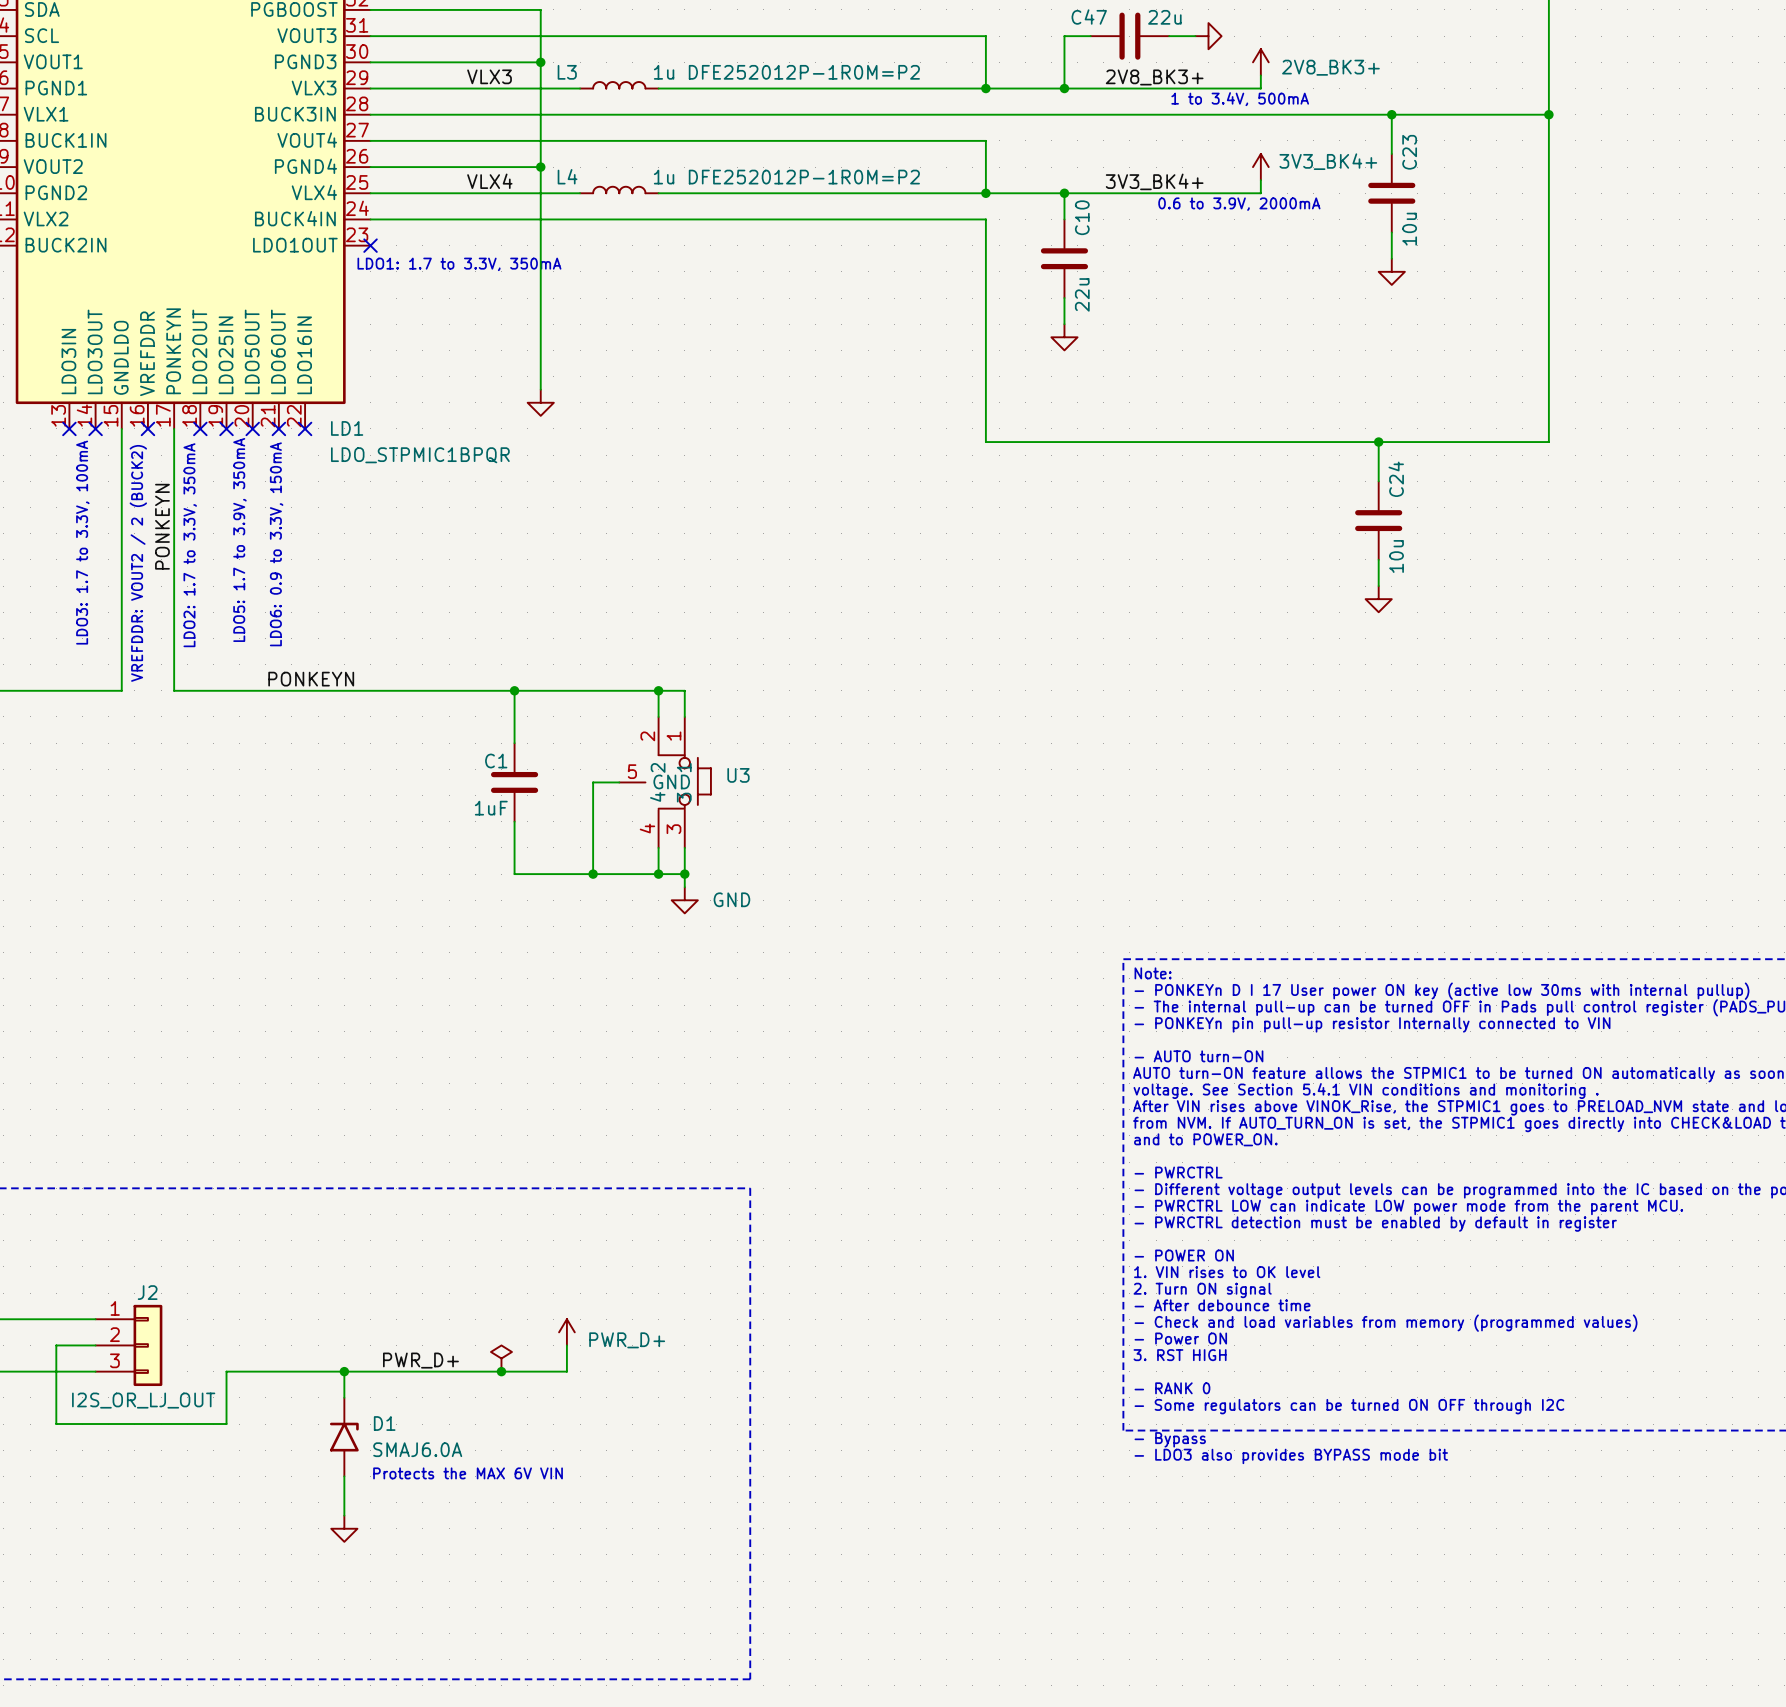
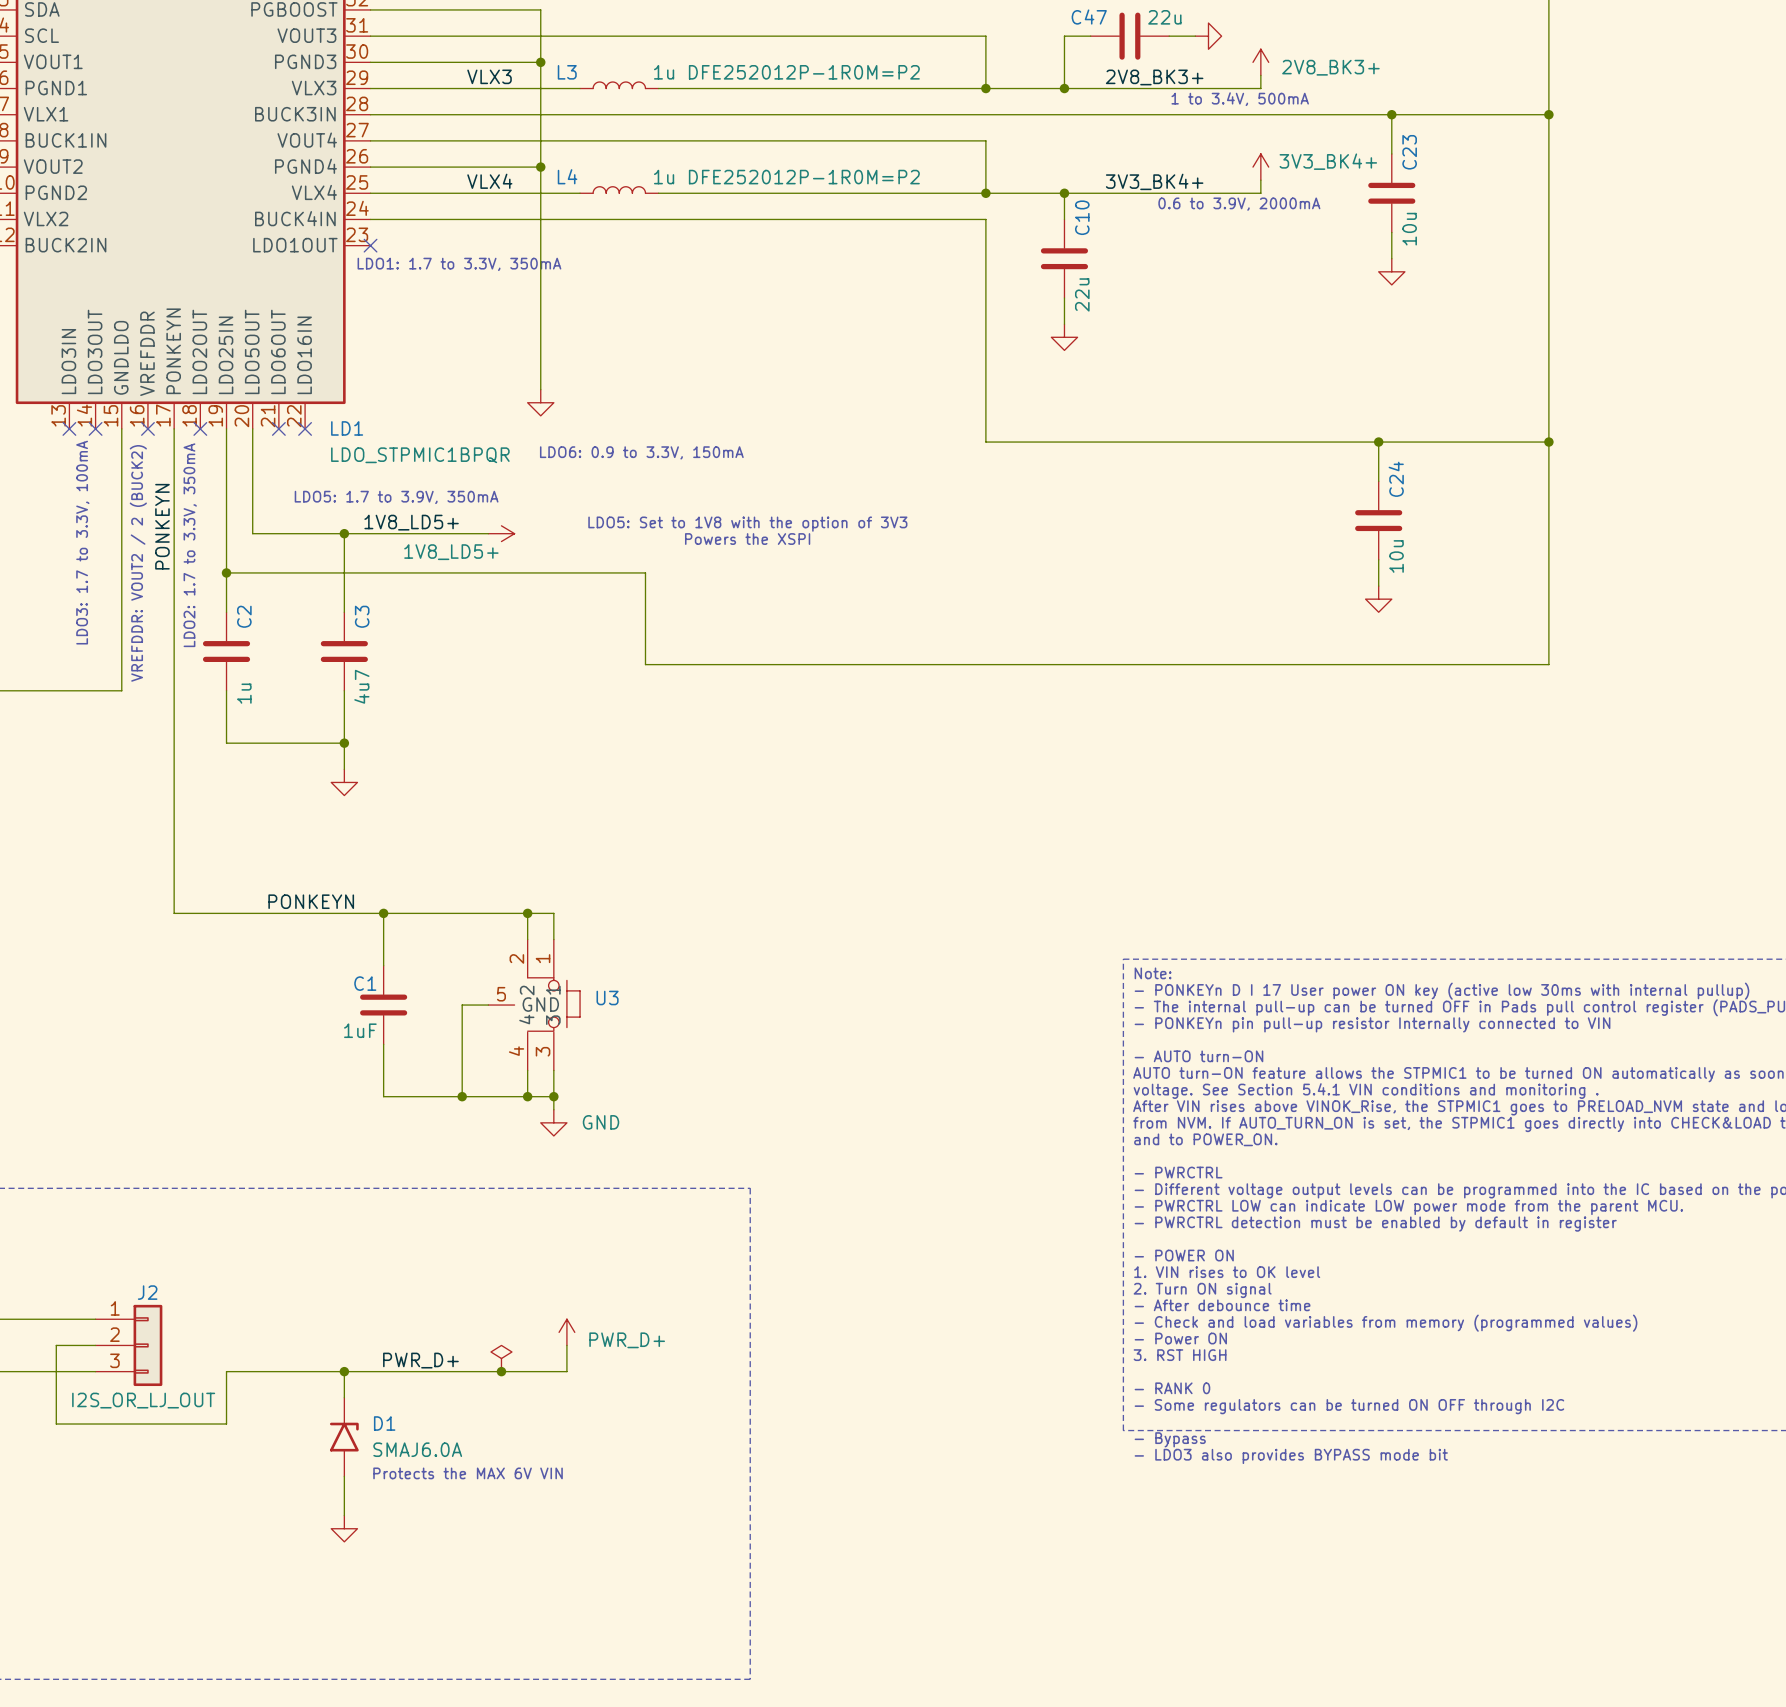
wire: none -> (226, 428) (226, 612)
no-connect mark: (226, 428) -> none
wire: none -> (252, 428) (252, 533) (488, 533)
no-connect mark: (252, 428) -> none
wire: none -> (1548, 442) (1548, 664) (645, 664) (645, 572) (226, 572)
junction: none -> (1548, 442)
text: none -> LDO6: 0.9 to 3.3V, 150mA (641, 452)
label: none -> 1V8_LD5+ (411, 522)
text: none -> LDO5: Set to 1V8 with the option of 3V3 (747, 524)
wire: none -> (344, 533) (344, 612)
junction: none -> (344, 533)
power symbol: none -> 1V8_LD5+ (501, 533)
text rotation: 0° (239, 539) -> 90° clockwise (396, 497)
text: none -> Powers the XSPI (747, 539)
text: LDO6: 0.9 to 3.3V, 150mA (276, 544) -> none
junction: none -> (226, 572)
C2: none -> 1u (226, 651)
C3: none -> 4u7 (344, 651)
label position: PONKEYN (311, 679) -> PONKEYN (311, 901)
wire: (174, 690) (684, 690) (684, 716) -> (174, 690) (174, 913) (553, 913) (553, 939)
wire: none -> (226, 690) (226, 743) (344, 743)
wire: none -> (344, 690) (344, 769)
wire: (514, 690) (514, 743) -> none
junction: (514, 690) -> none
wire: (658, 690) (658, 716) -> none
junction: (658, 690) -> none
junction: none -> (344, 743)
power symbol: none -> (344, 782)
C1 position: (514, 782) -> (383, 1005)
wire: (619, 782) (593, 782) (593, 874) -> none
U3 position: (665, 782) -> (534, 1005)
wire: (514, 821) (514, 874) (684, 874) -> none
wire: (658, 847) (658, 874) -> (527, 913) (527, 939)
wire: (684, 847) (684, 887) -> none
junction: (593, 874) -> none
junction: (658, 874) -> none
junction: (684, 874) -> none
power symbol: GND (684, 900) -> none
wire: none -> (383, 913) (383, 965)
junction: none -> (383, 913)
junction: none -> (527, 913)
wire: none -> (488, 1005) (462, 1005) (462, 1096)
wire: none -> (383, 1044) (383, 1096) (553, 1096)
wire: none -> (527, 1070) (527, 1096)
wire: none -> (553, 1070) (553, 1109)
junction: none -> (462, 1096)
junction: none -> (527, 1096)
junction: none -> (553, 1096)
power symbol: none -> GND (553, 1122)

